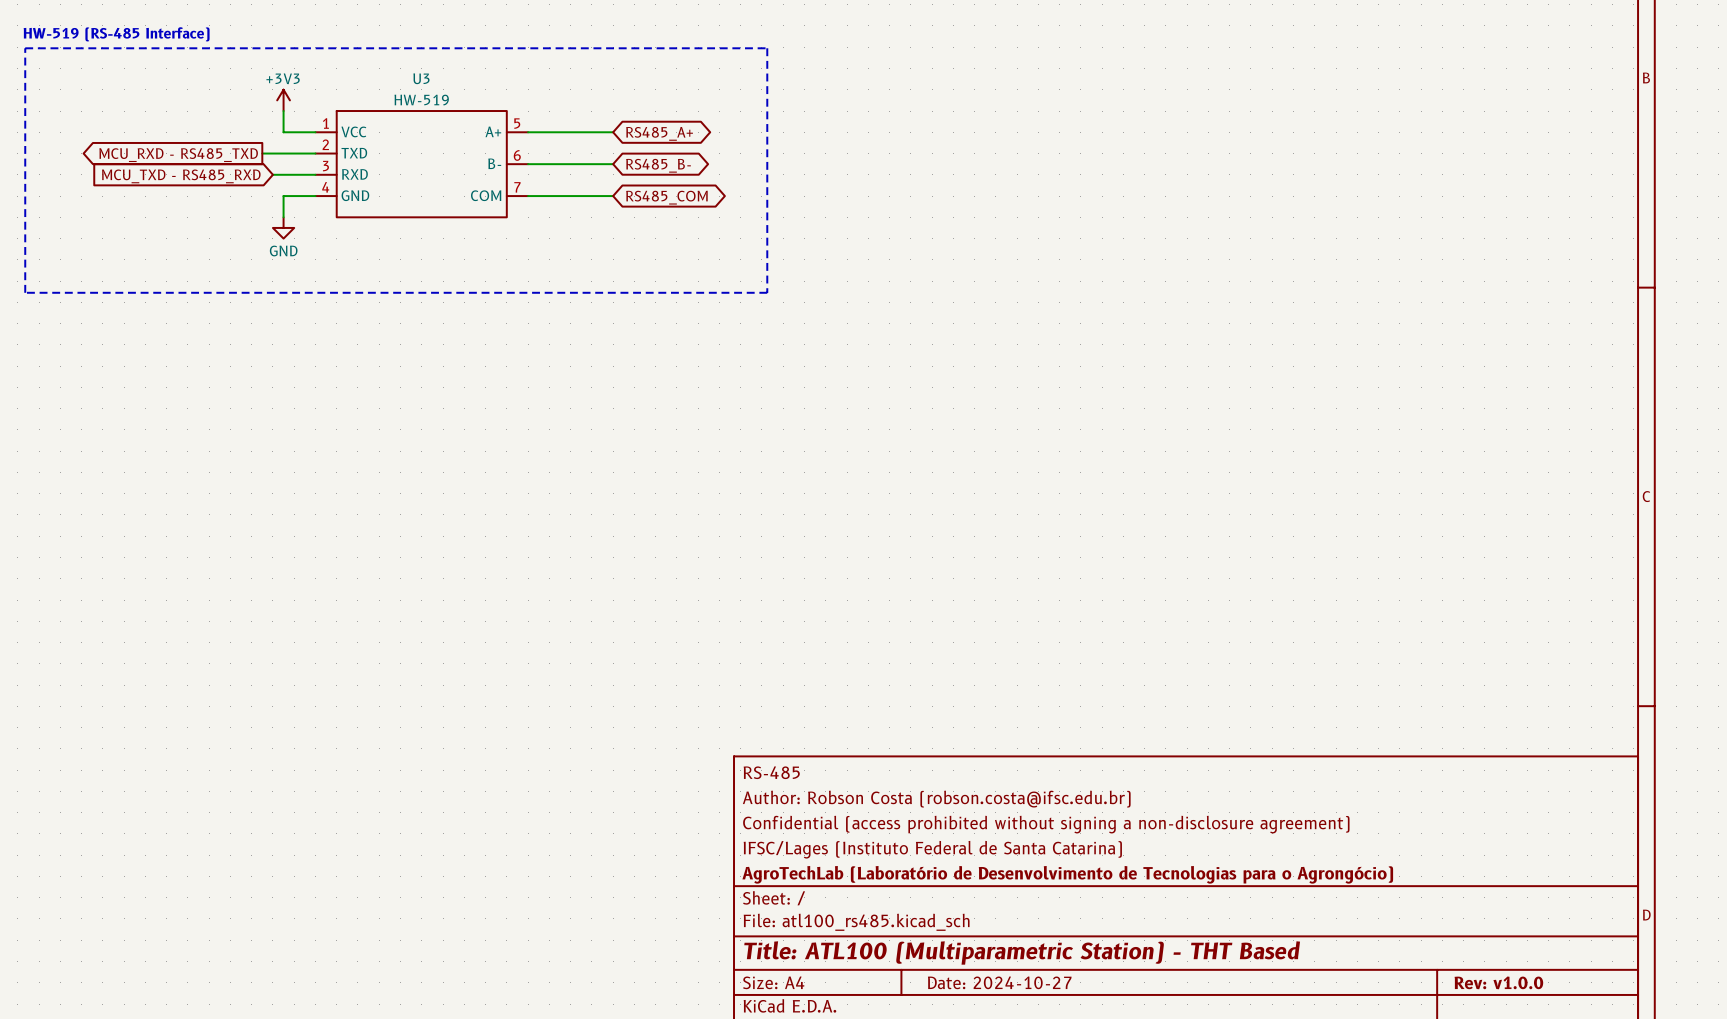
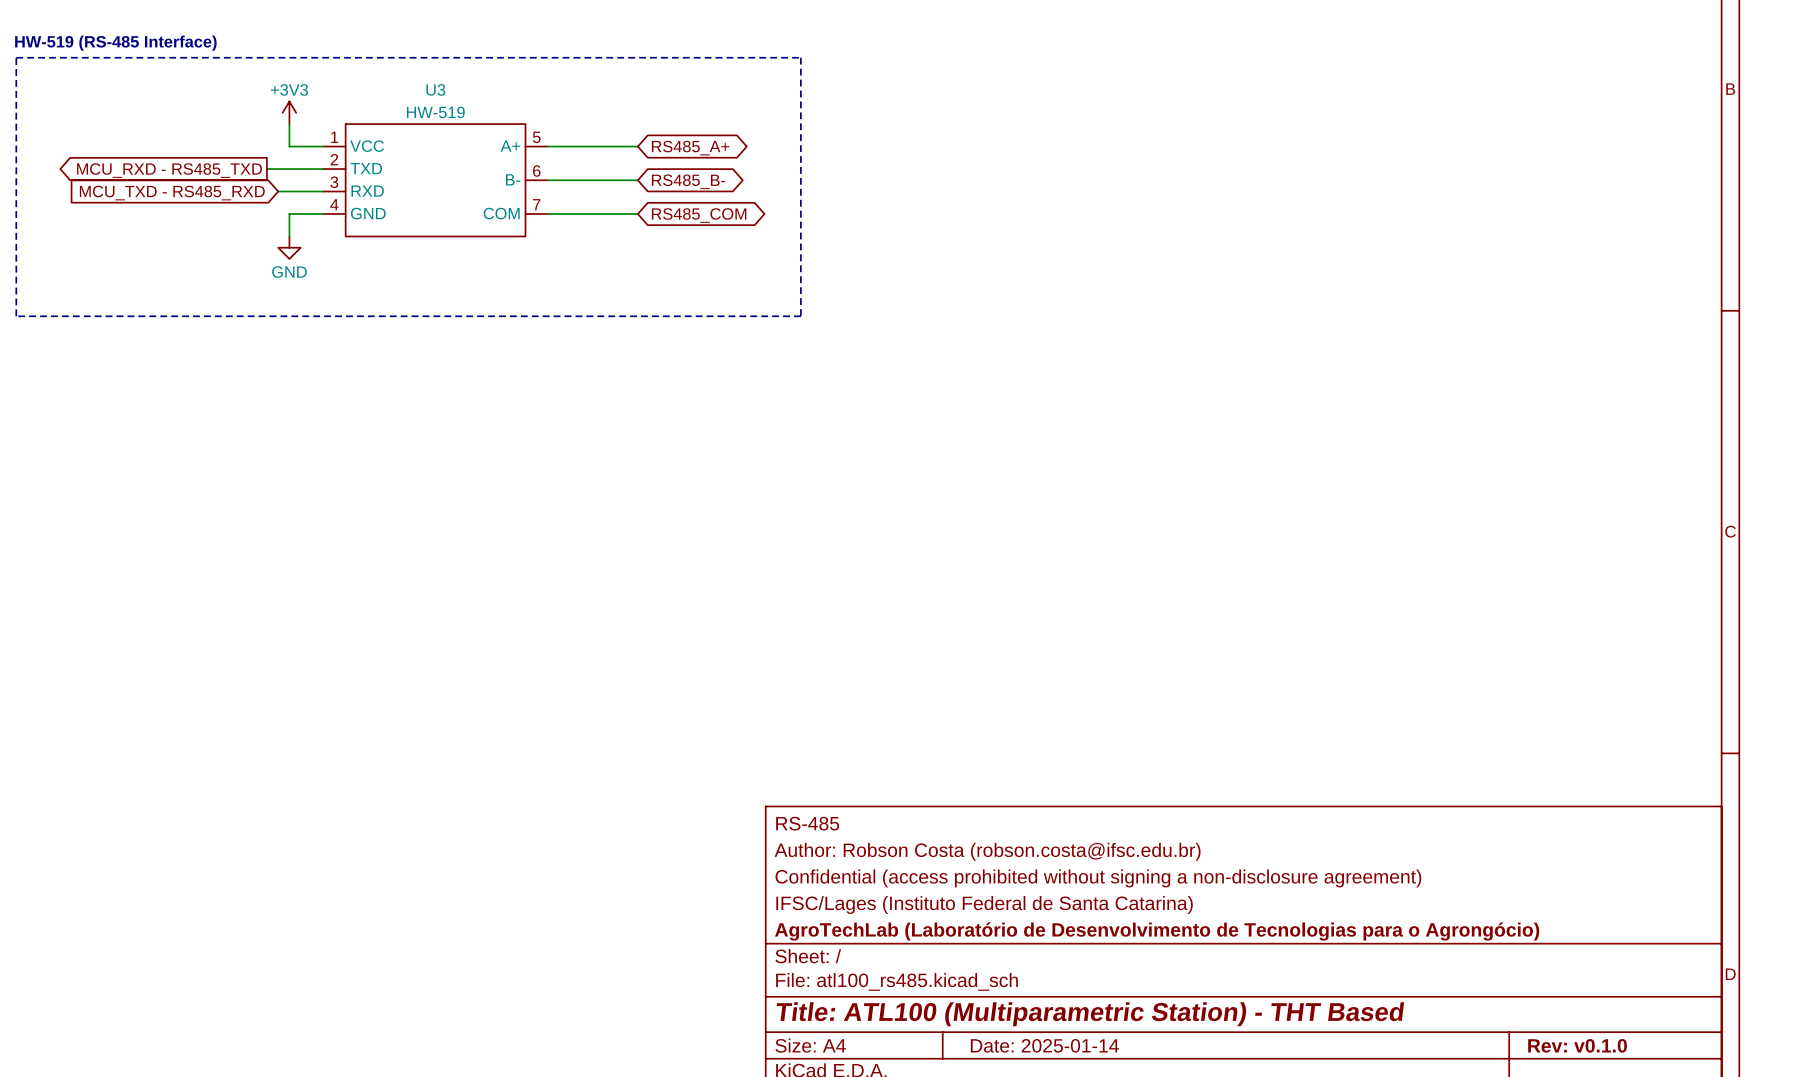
title block: Date: 2024-10-27 (999, 982) -> Date: 2025-01-14 (1044, 1045)
title block: Rev: v1.0.0 (1498, 982) -> Rev: v0.1.0 (1577, 1045)

